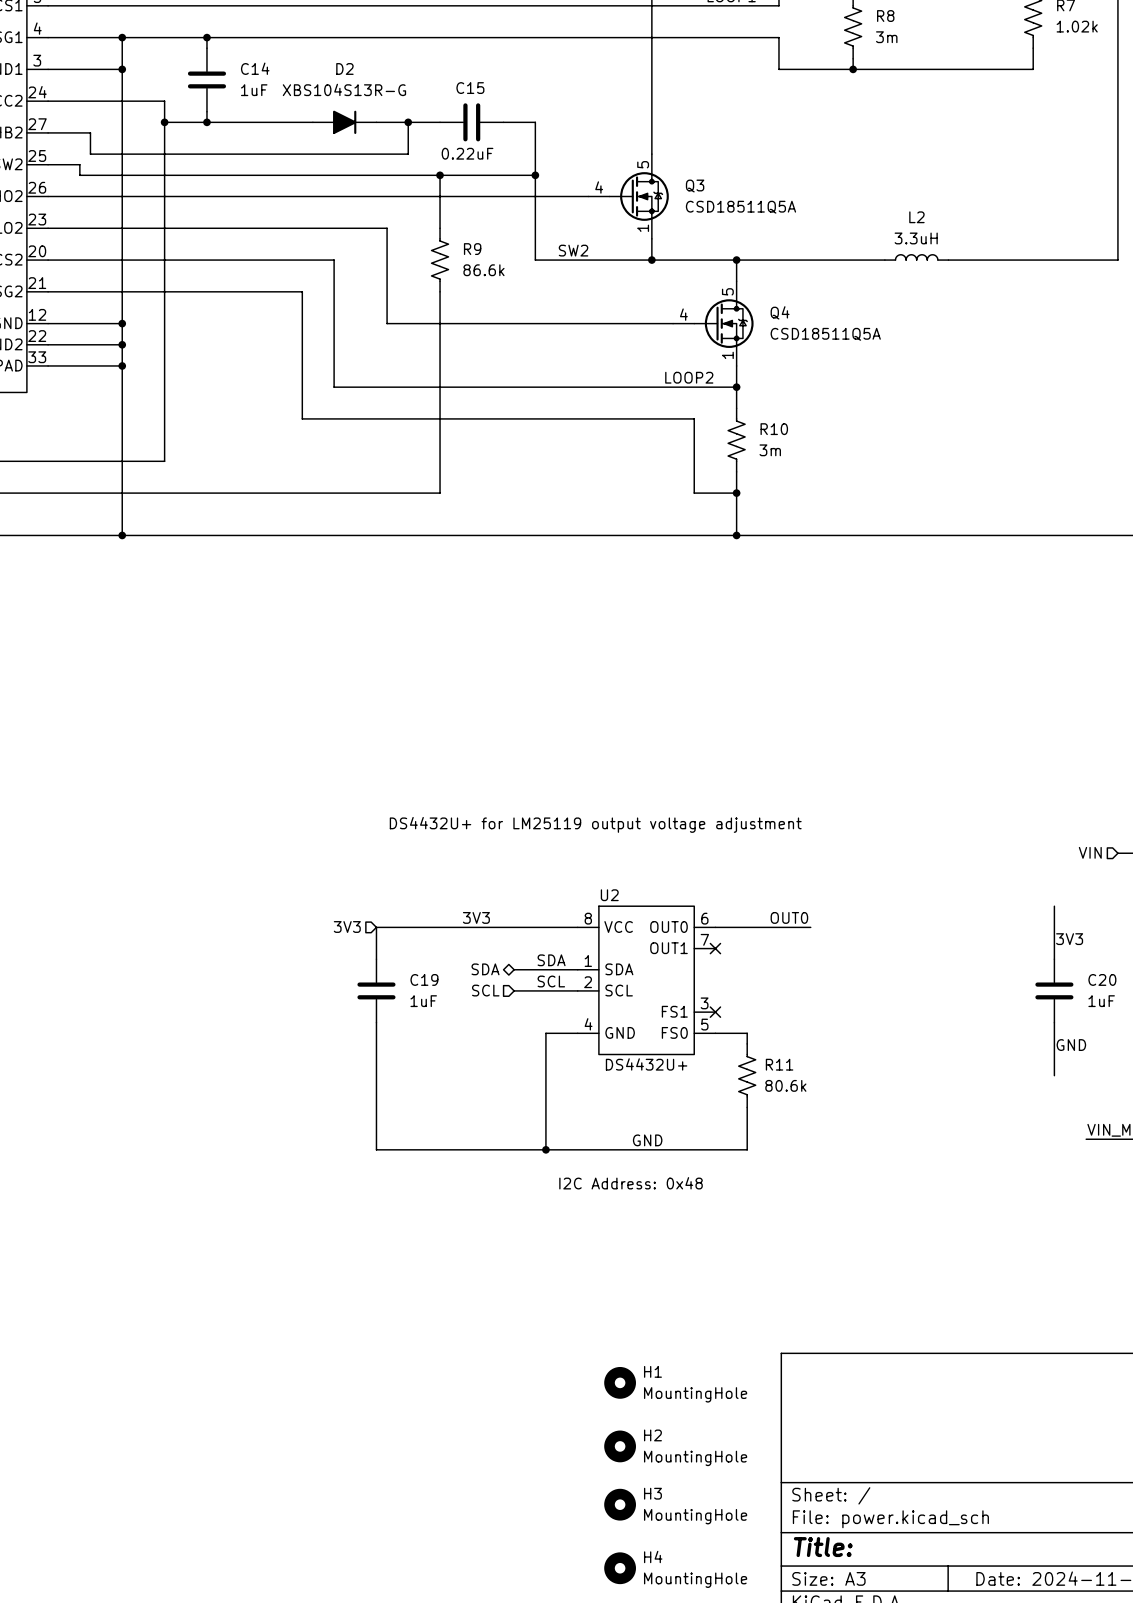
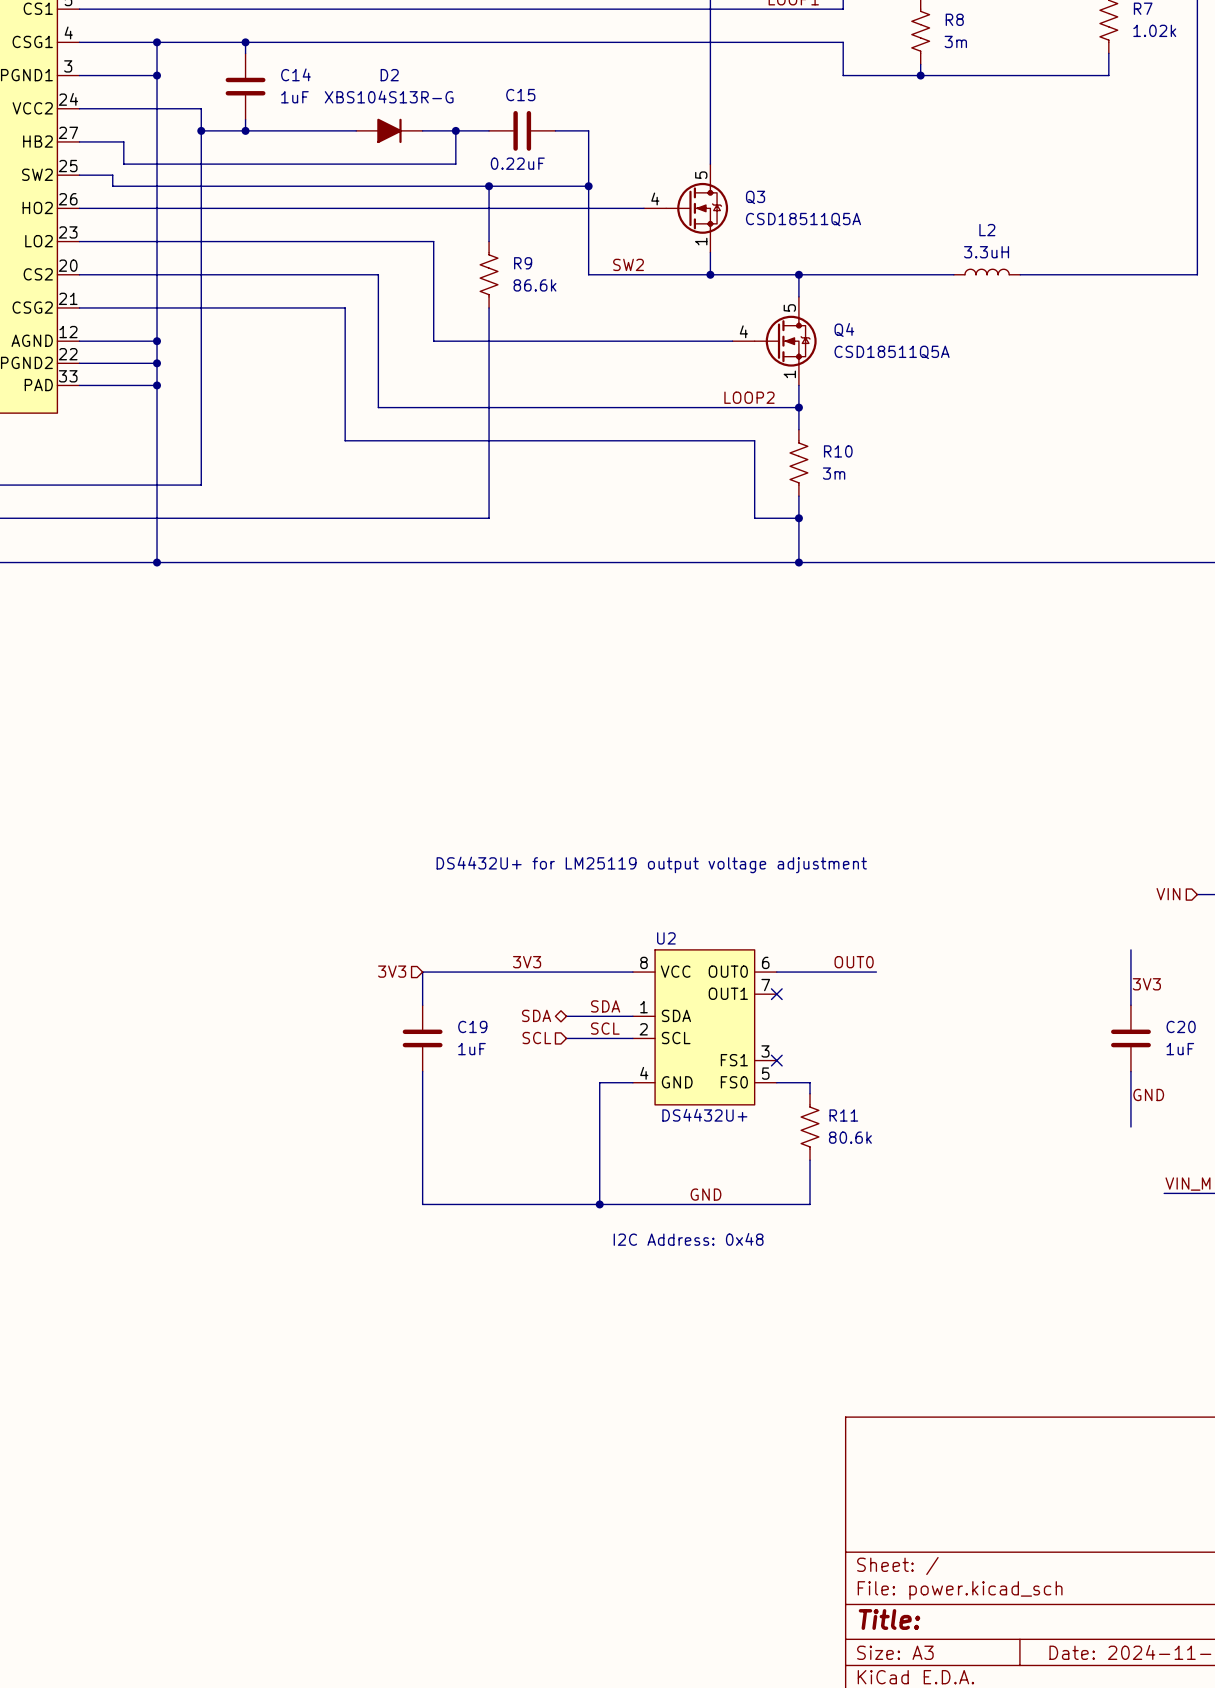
H1: MountingHole (620, 1382) -> none
H2: MountingHole (620, 1446) -> none
H3: MountingHole (620, 1504) -> none
H4: MountingHole (620, 1568) -> none

